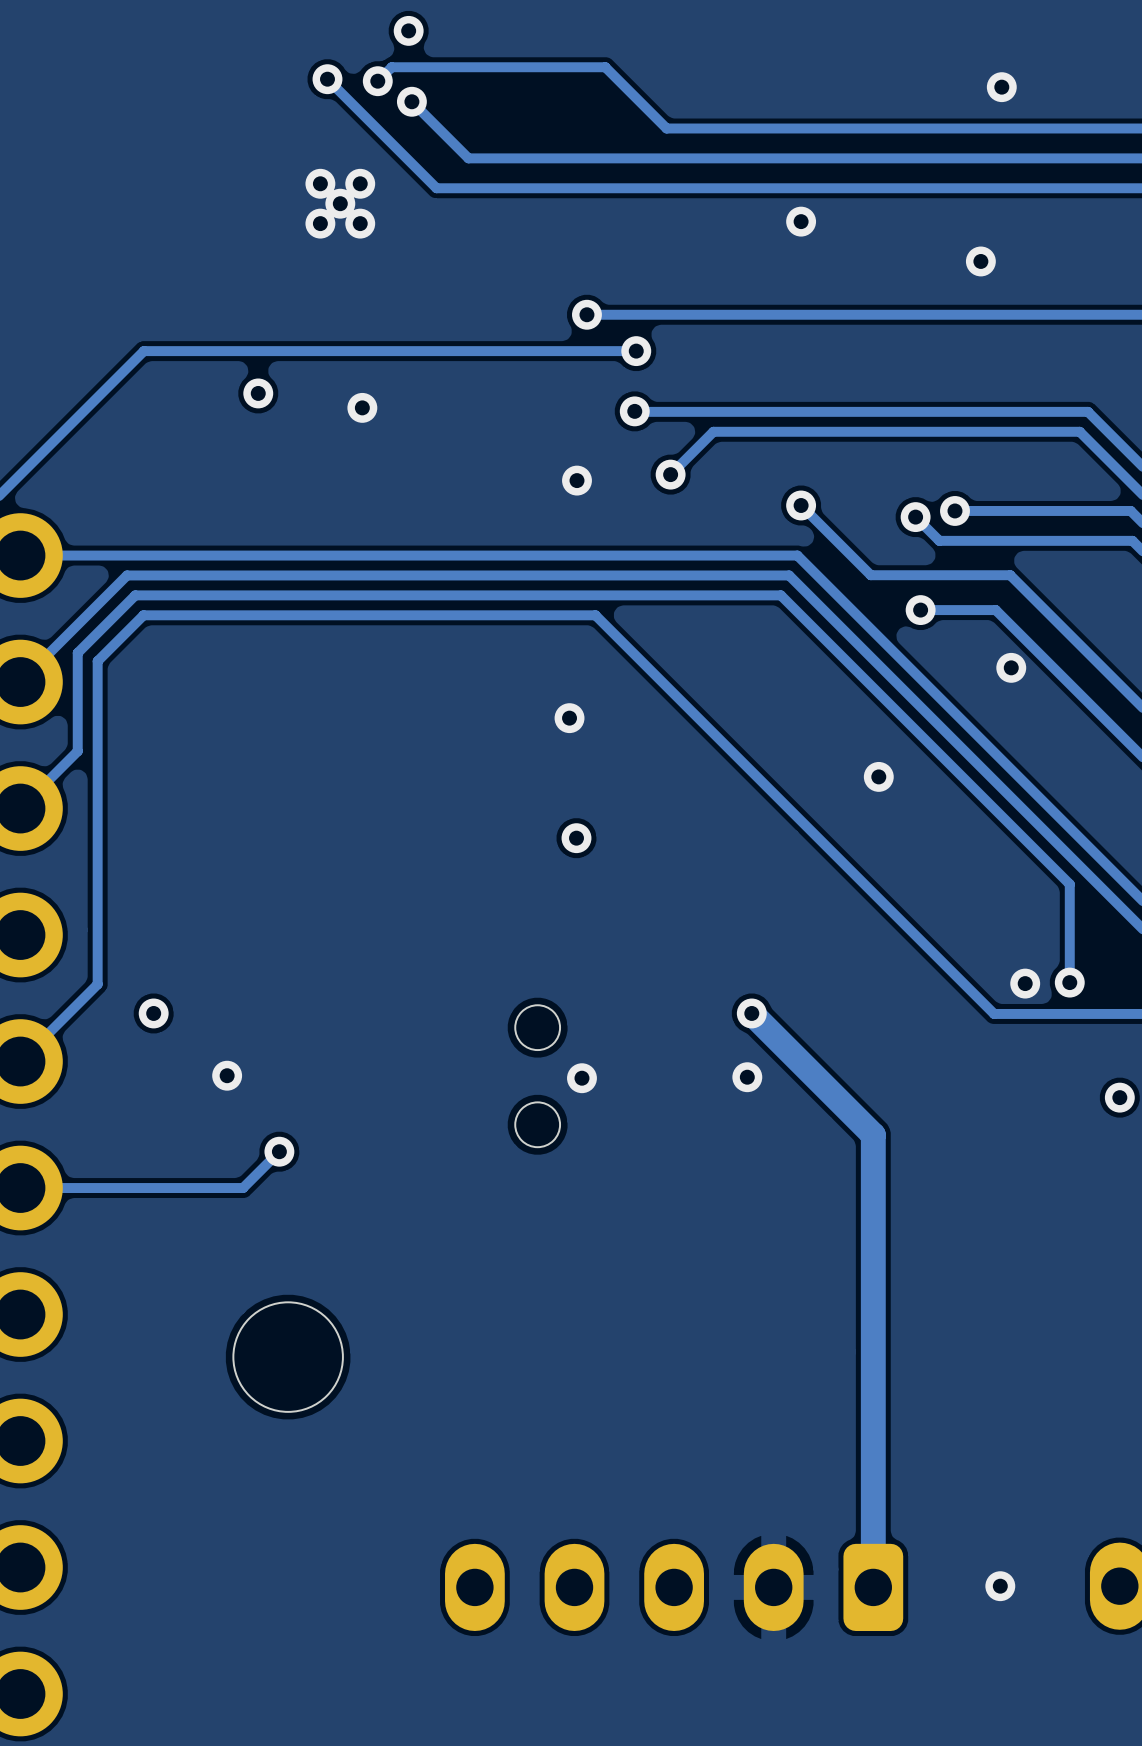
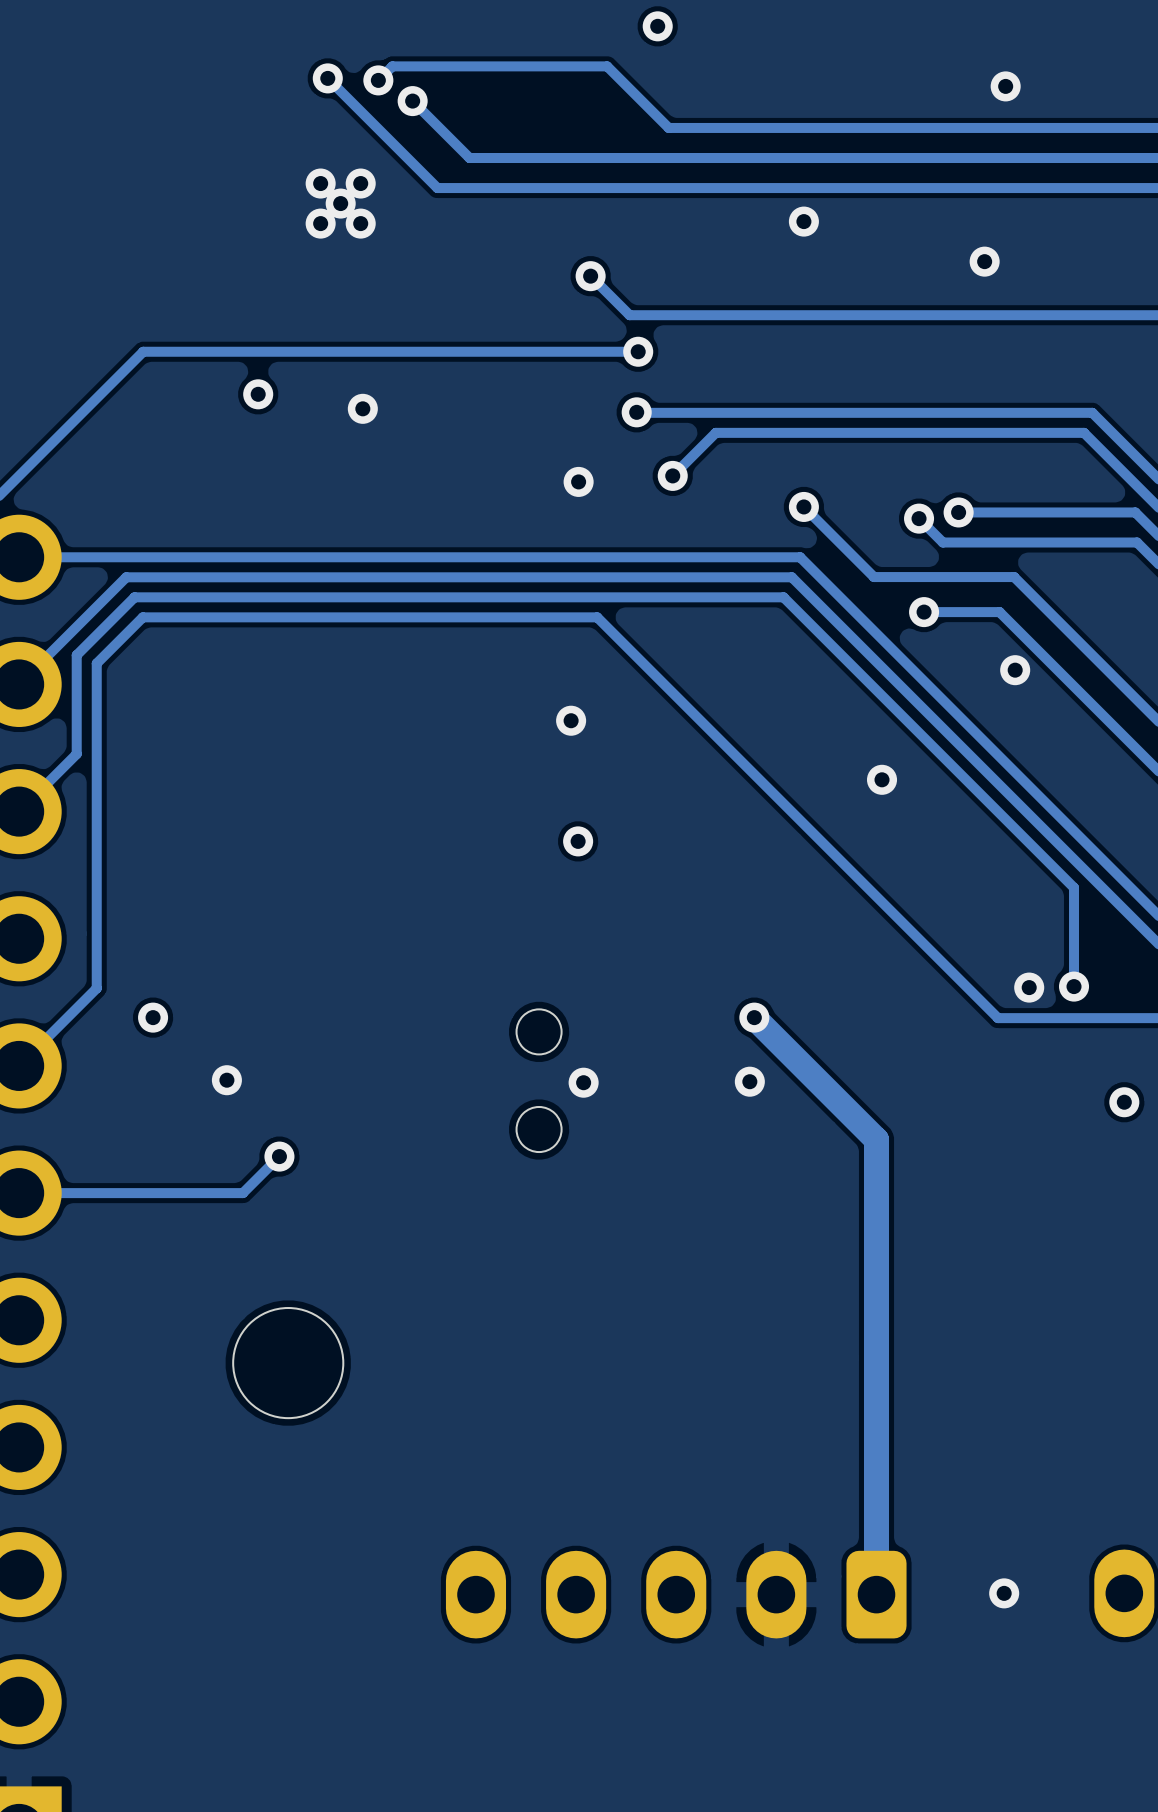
via: none -> (657, 26)
via: (408, 30) -> none
via position: (586, 314) -> (590, 276)
track: (627, 314) (586, 314) -> (629, 315) (590, 276)

